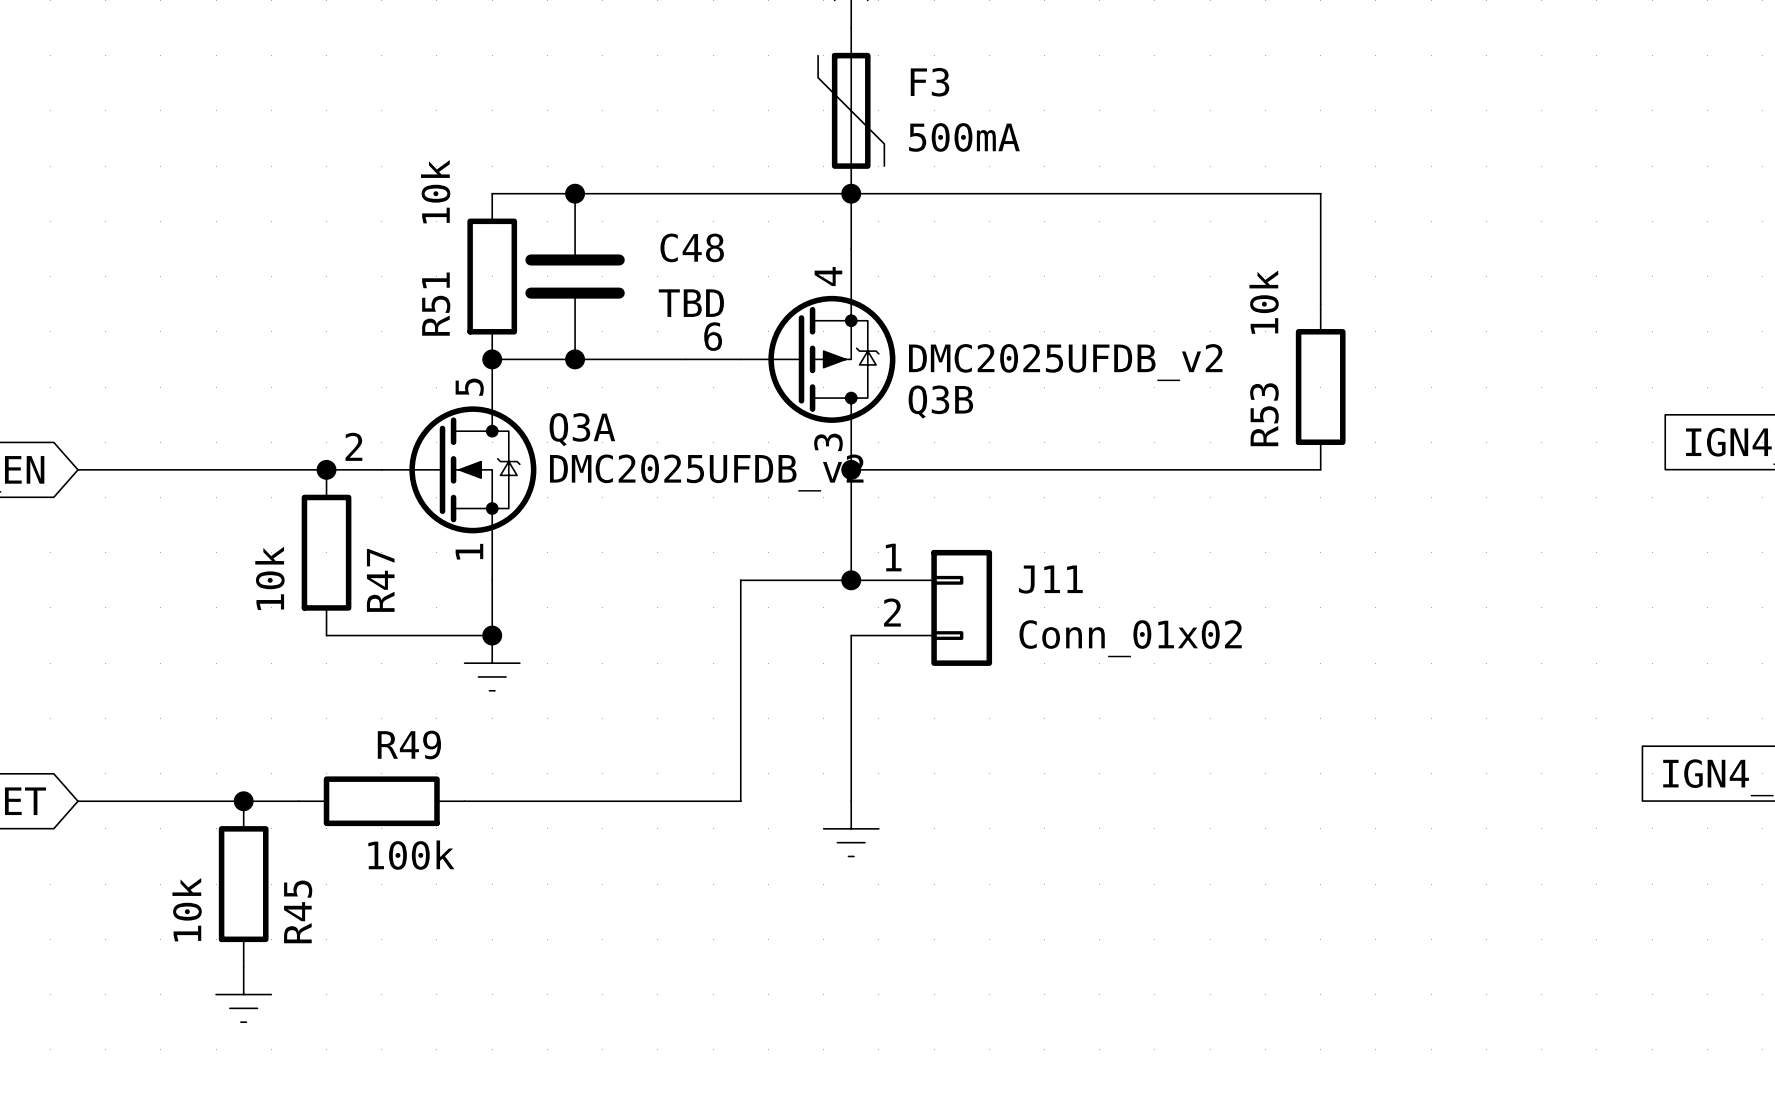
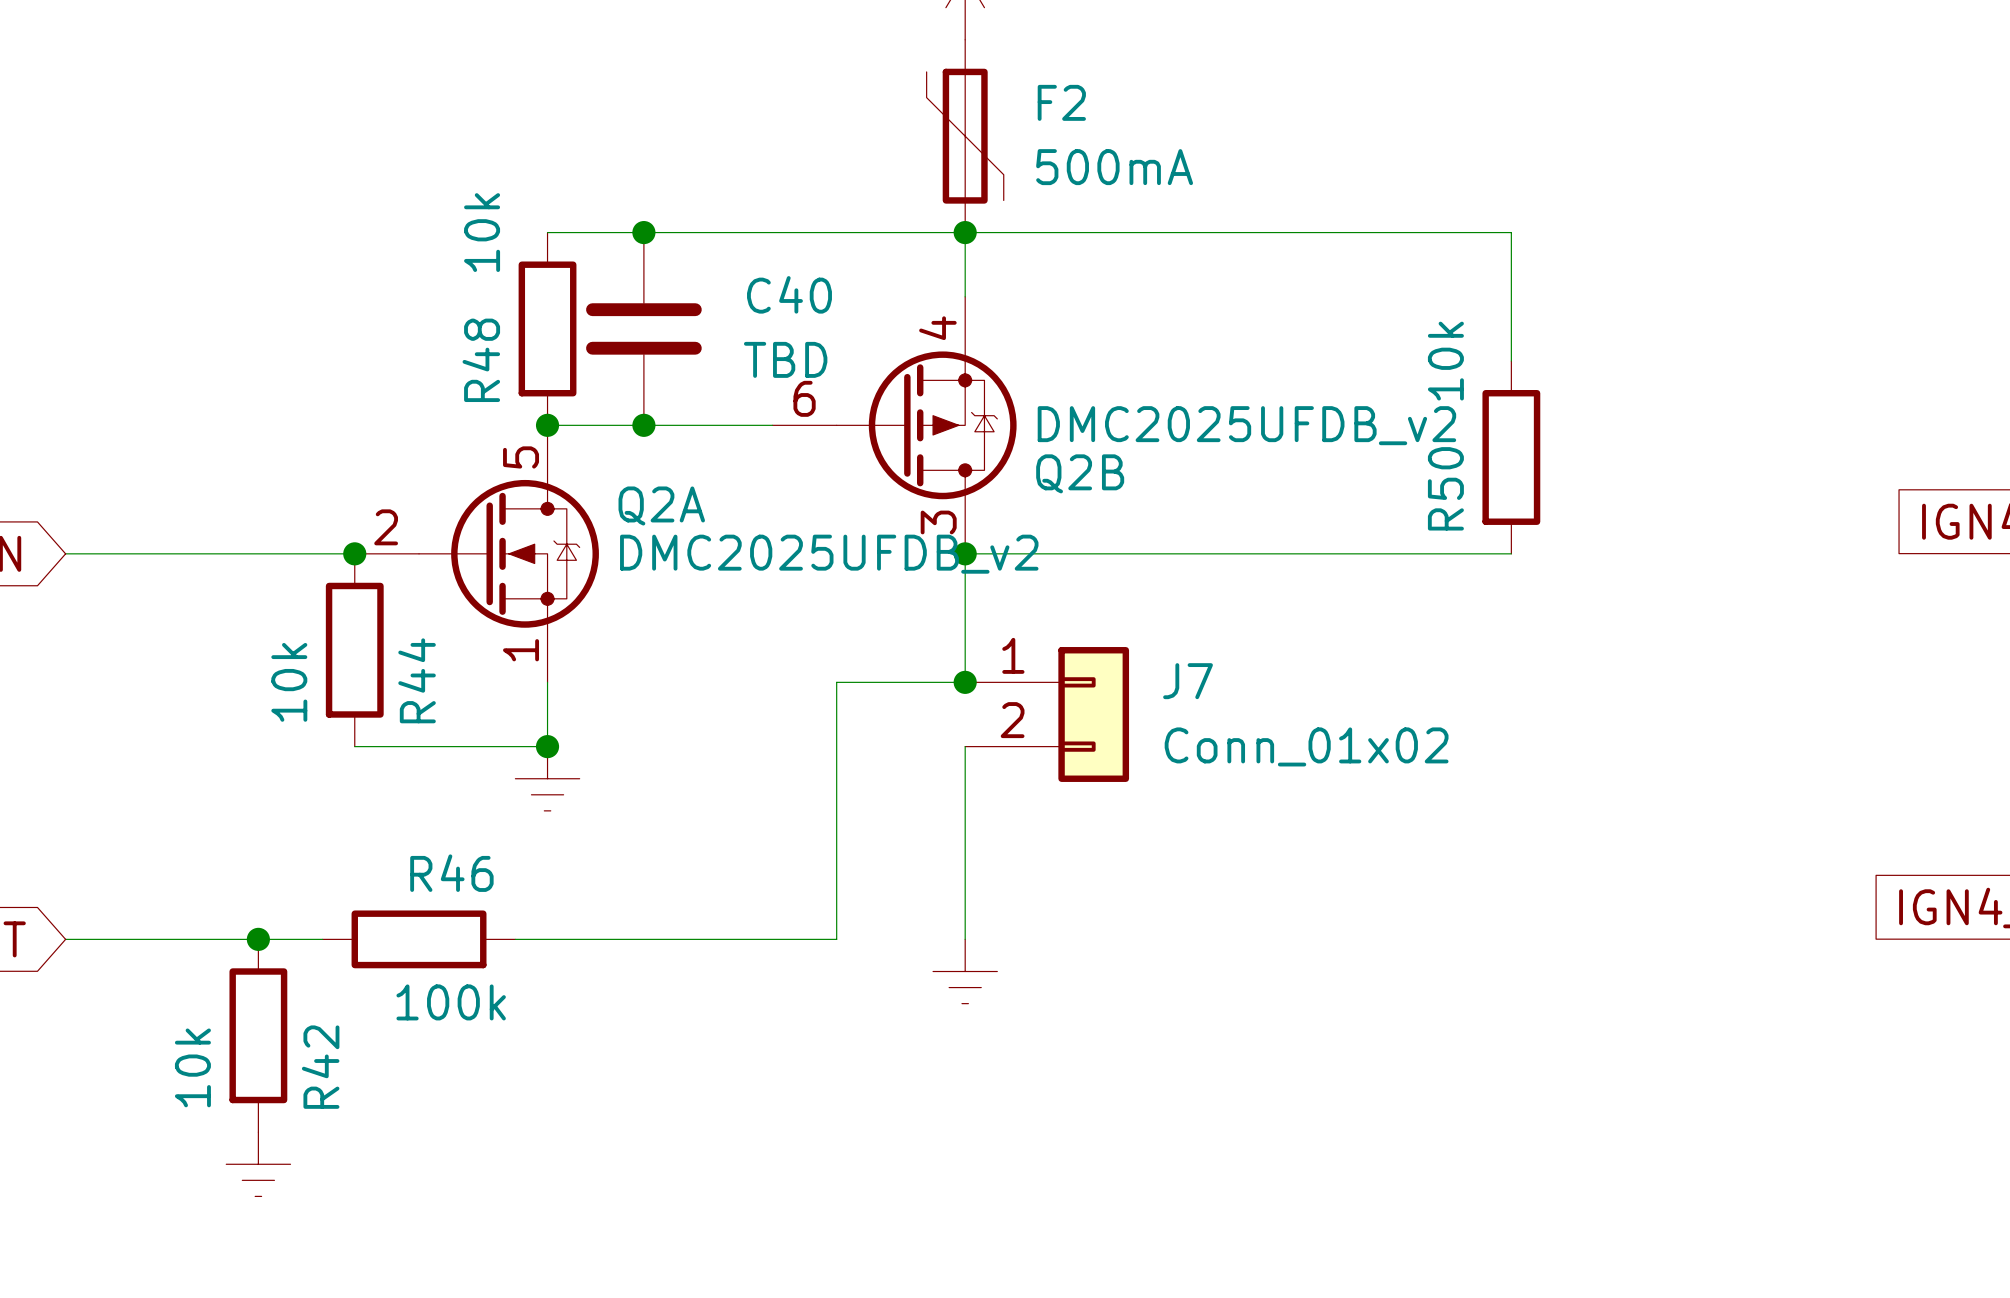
F3 name: F3 (929, 82) -> F2 (1061, 102)
C48 name: C48 (692, 247) -> C40 (789, 294)
R51 name: R51 (436, 304) -> R48 (481, 360)
Q3B name: Q3B (940, 402) -> Q2B (1080, 473)
R53 name: R53 (1264, 414) -> R50 (1445, 488)
Q3A name: Q3A (582, 429) -> Q2A (661, 505)
J11 name: J11 (1050, 579) -> J7 (1188, 681)
R47 name: R47 (380, 580) -> R44 (417, 680)
R49 name: R49 (409, 745) -> R46 (451, 873)
R45 name: R45 (298, 911) -> R42 (320, 1067)

